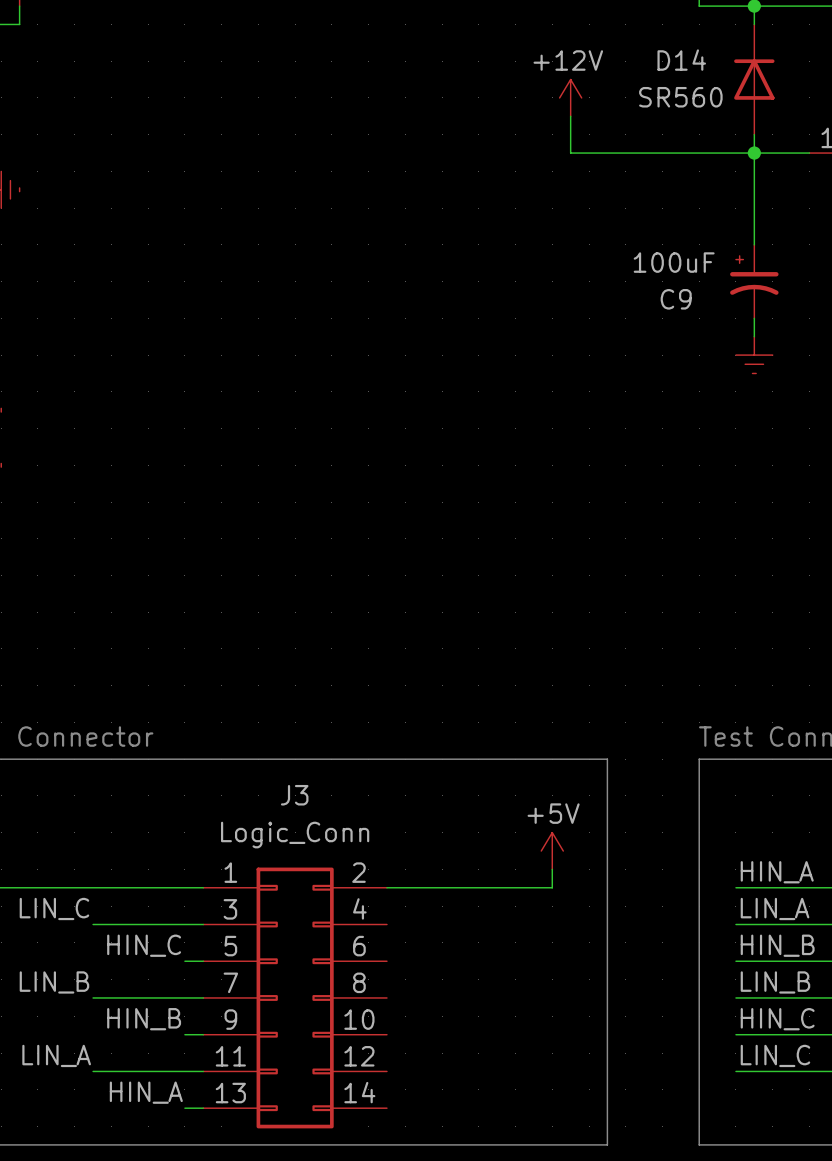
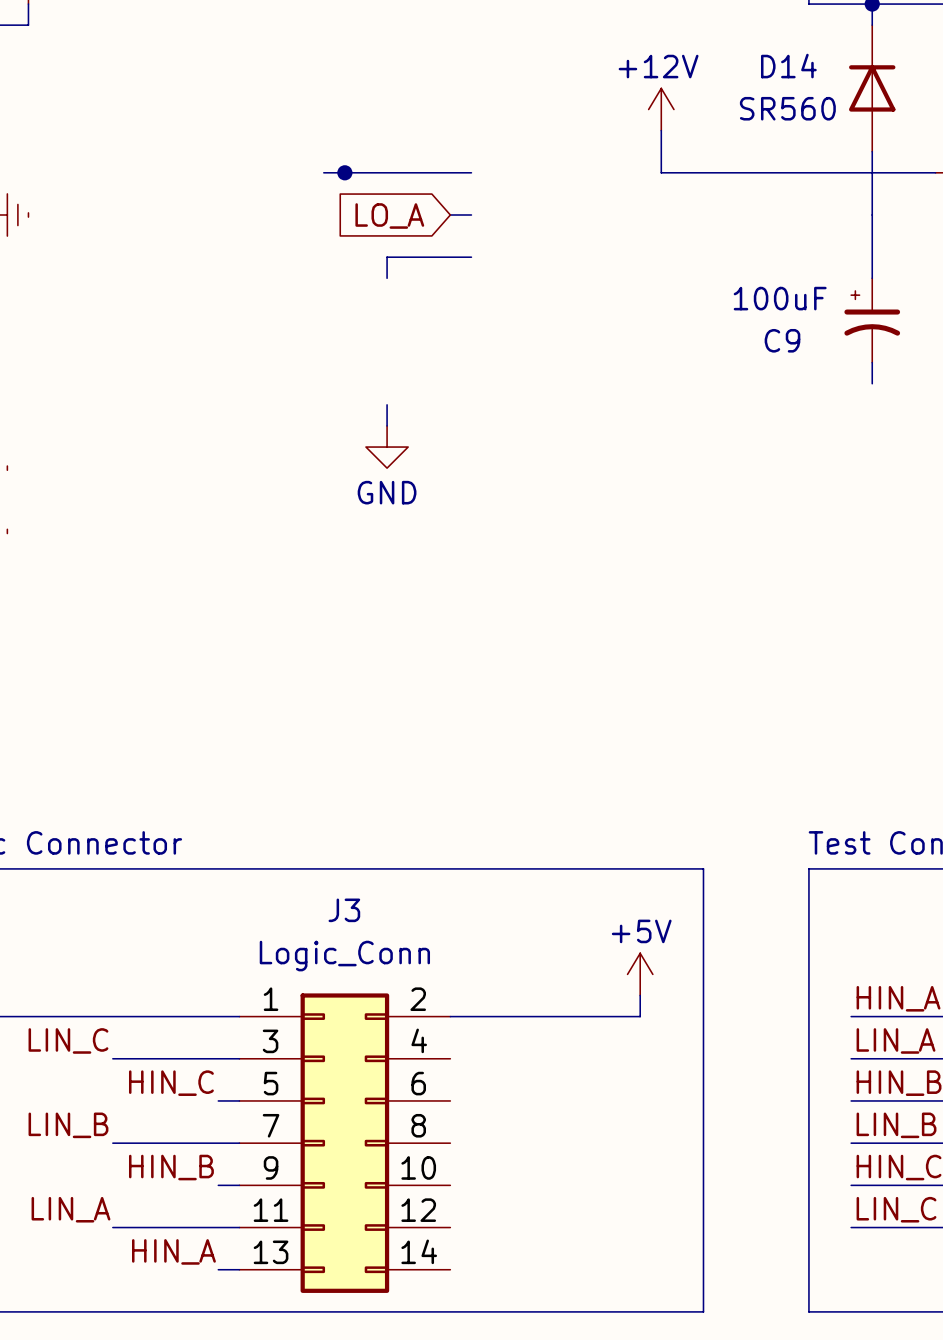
wire: none -> (323, 172) (471, 172)
junction: none -> (344, 172)
junction: (754, 153) -> none
wire: none -> (450, 215) (471, 215)
global label: none -> LO_A (389, 216)
wire: none -> (471, 257) (387, 257) (387, 278)
wire: none -> (387, 404) (387, 425)
power symbol: (754, 355) -> none
power symbol: none -> GND (387, 447)

